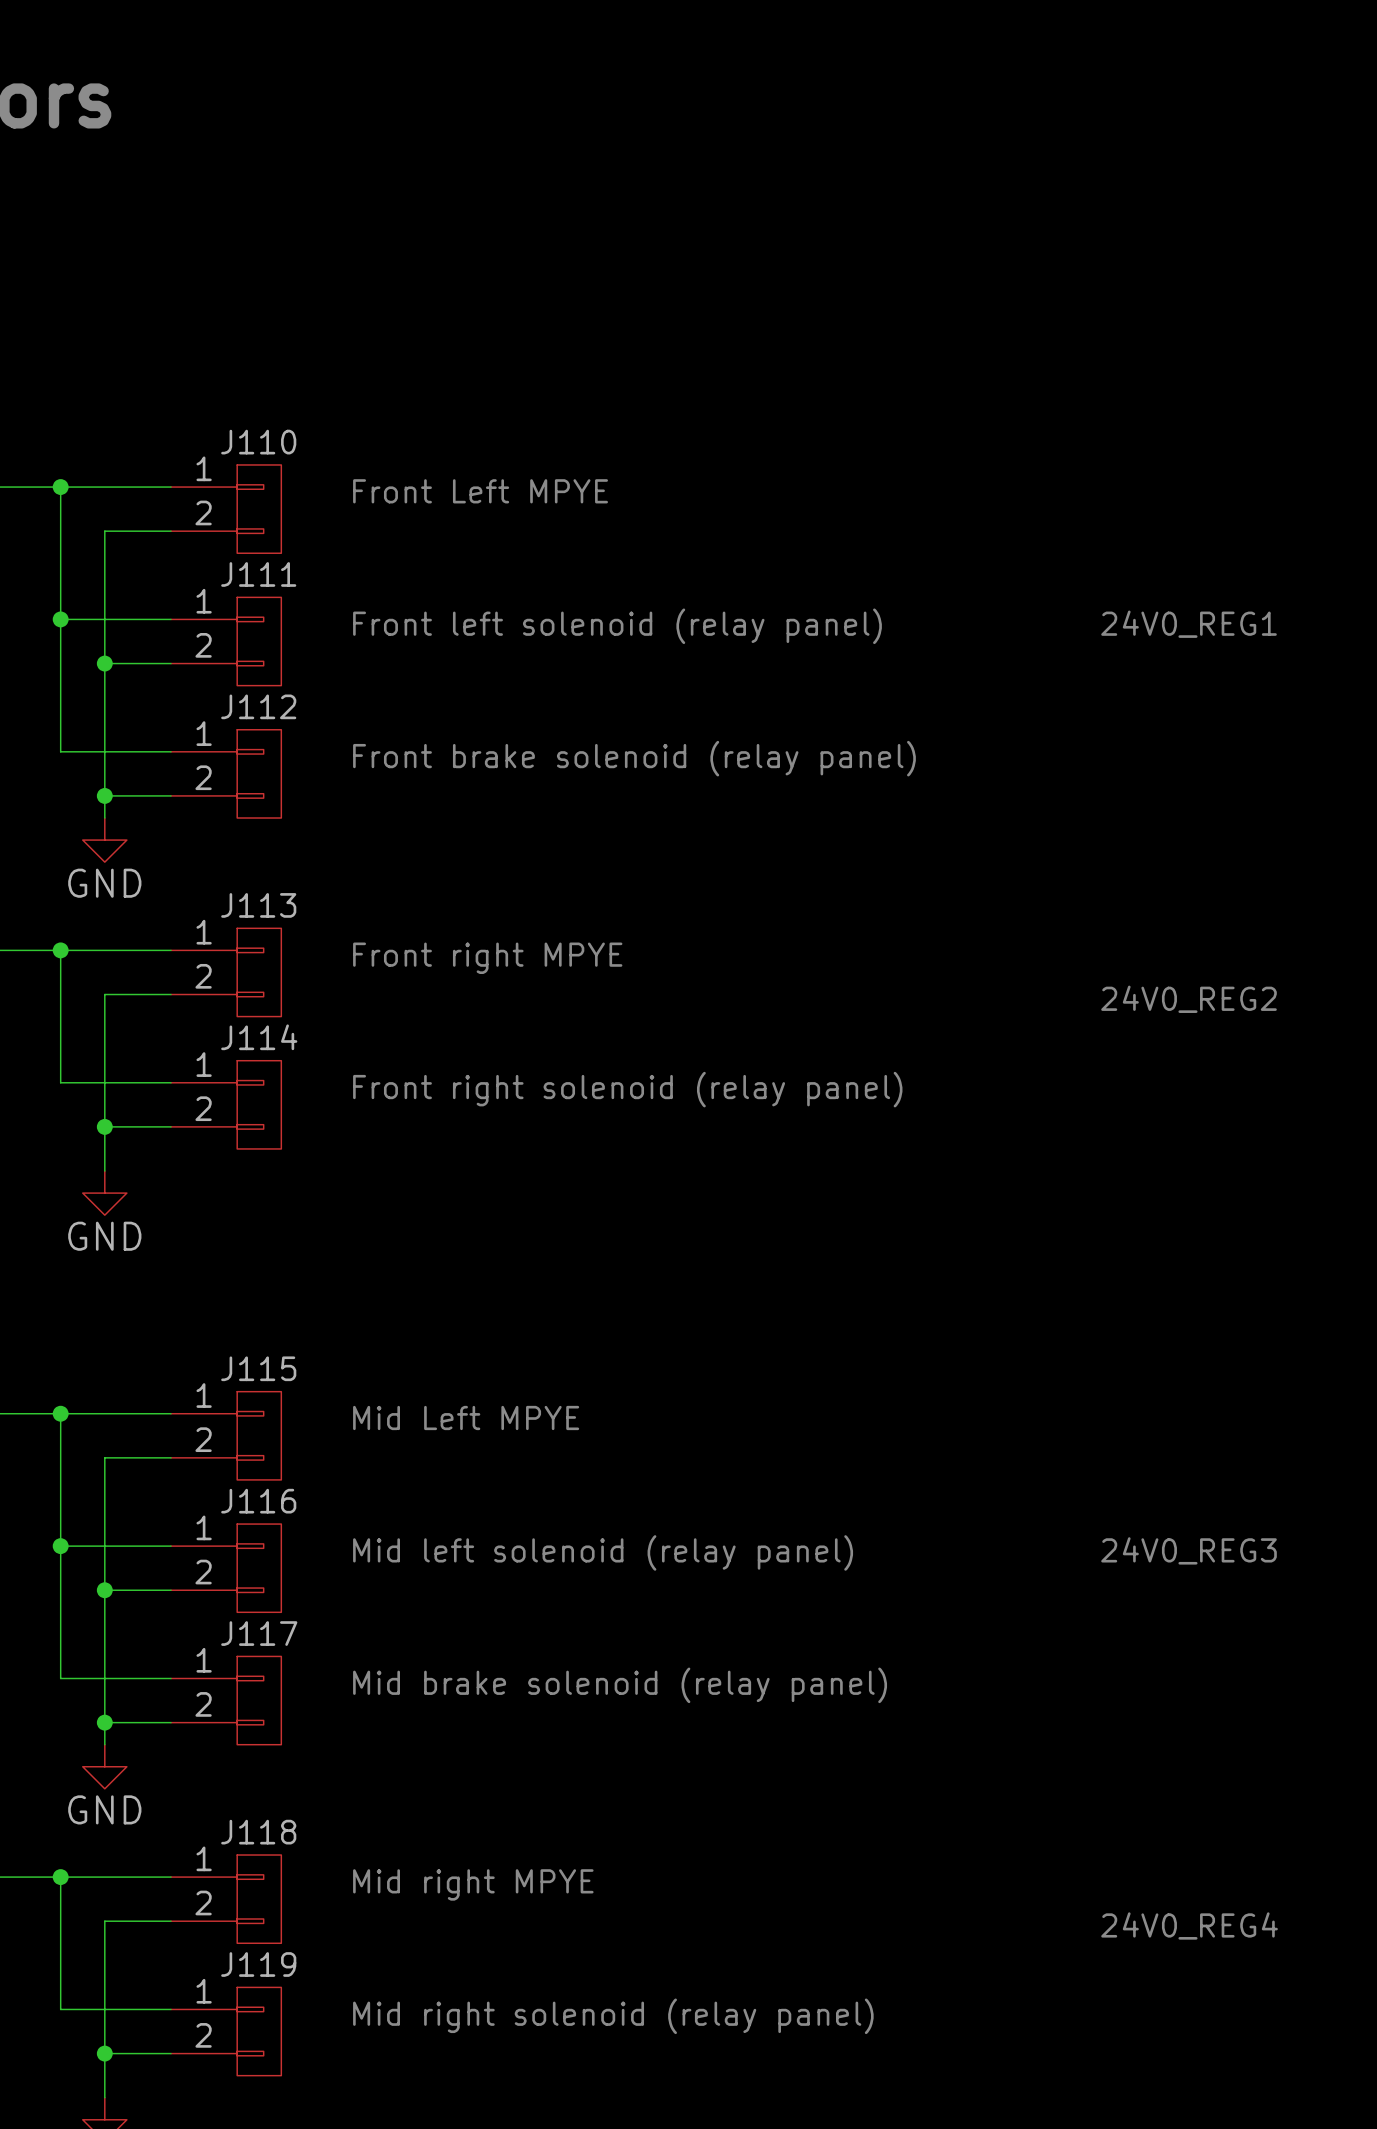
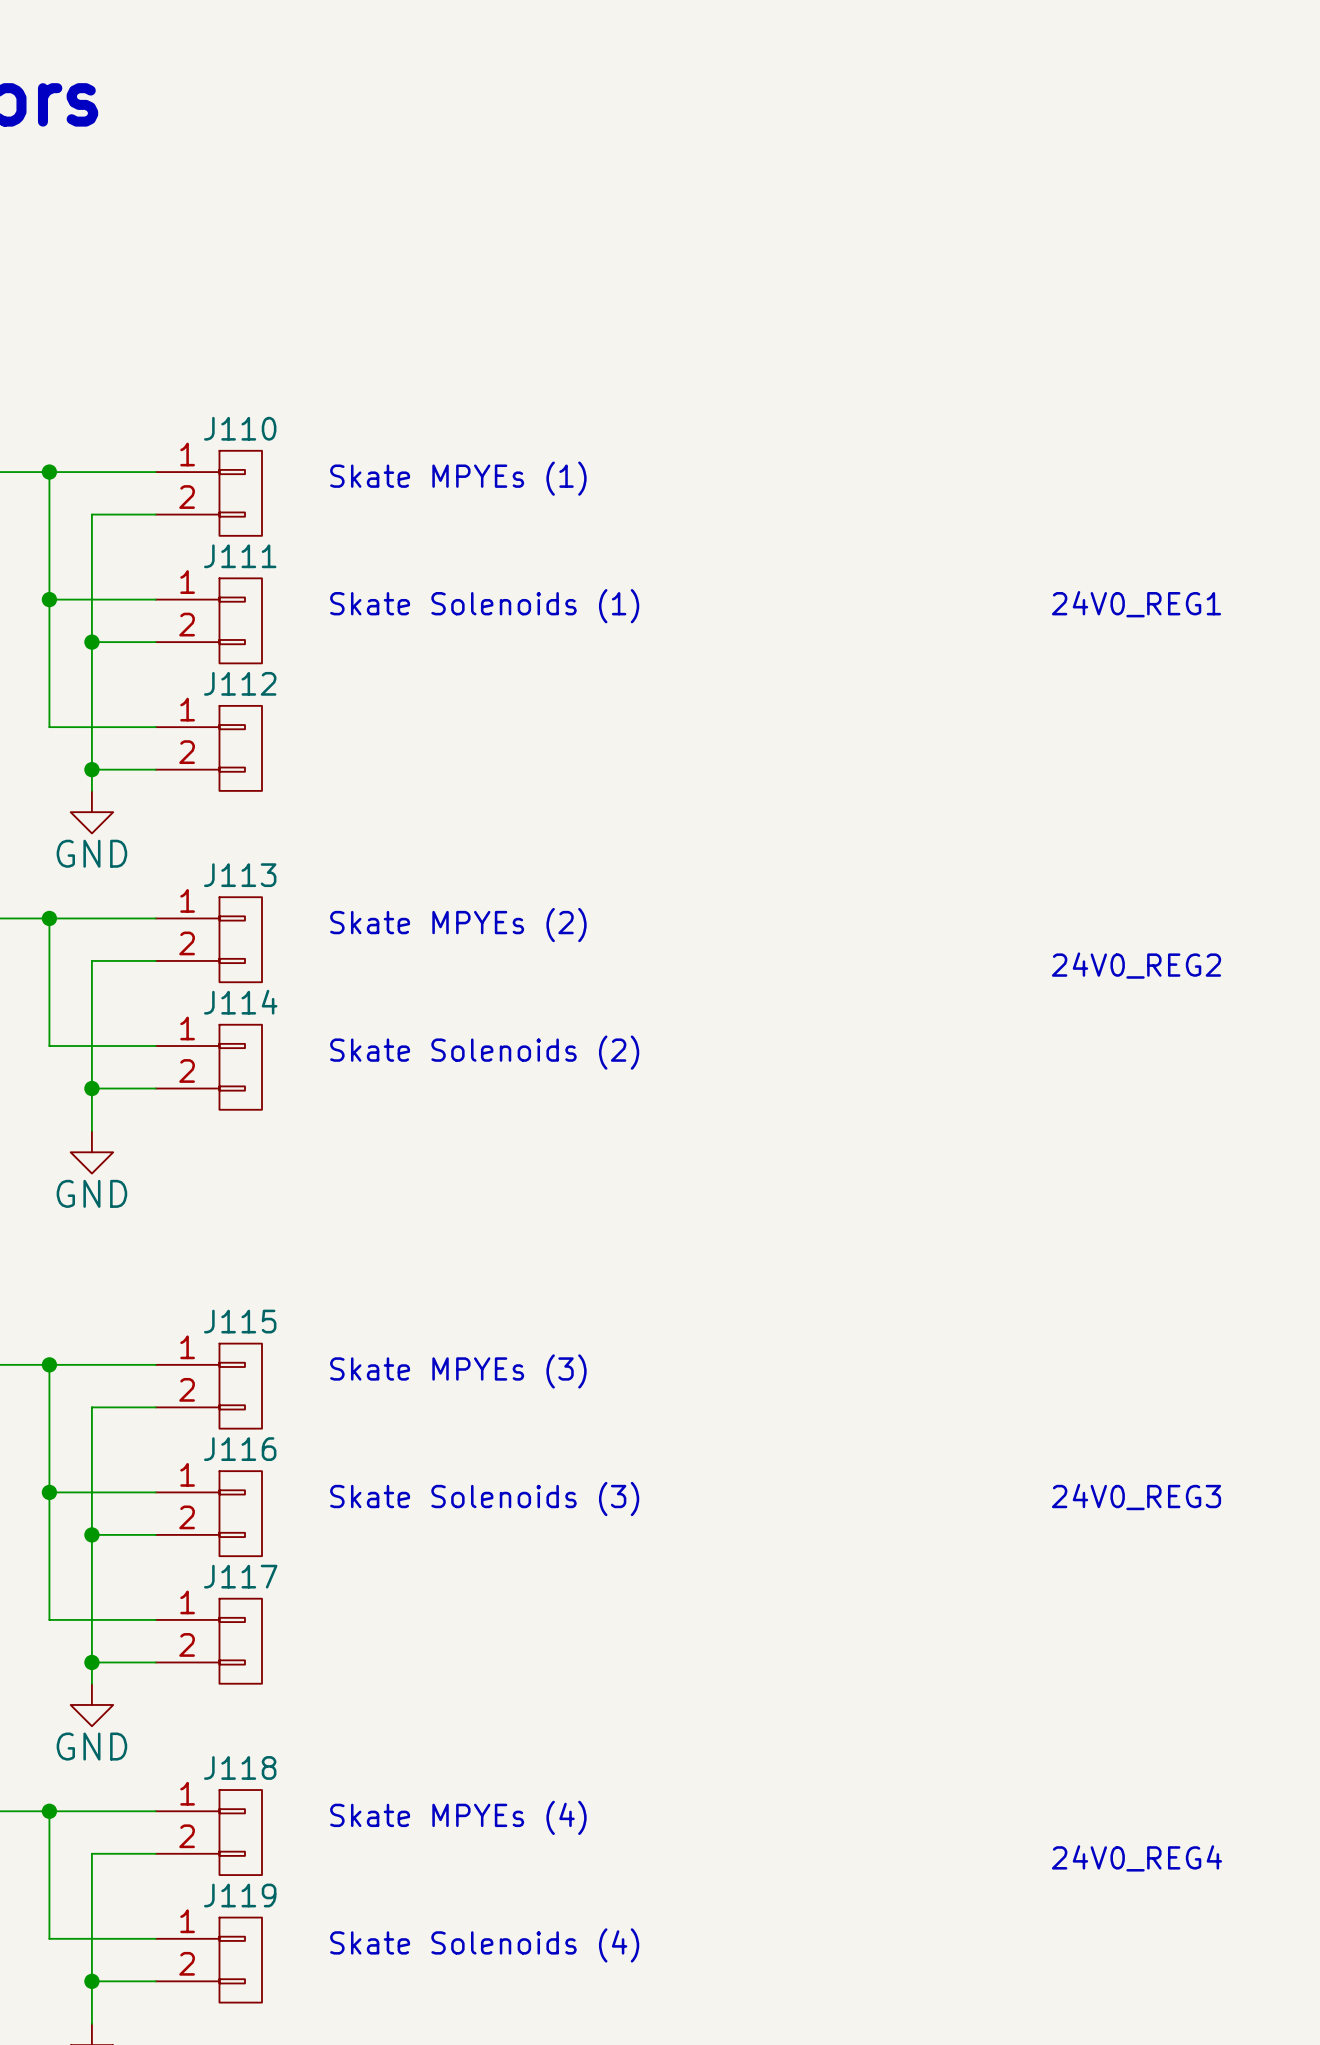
text: Front Left MPYE (480, 491) -> Skate MPYEs (1) (458, 478)
text: Front left solenoid (relay panel) (617, 626) -> Skate Solenoids (1) (484, 606)
text: Front brake solenoid (relay panel) (634, 758) -> none
text: Front right MPYE (487, 958) -> Skate MPYEs (2) (458, 925)
text: Front right solenoid (relay panel) (627, 1089) -> Skate Solenoids (2) (484, 1052)
text: Mid Left MPYE (466, 1417) -> Skate MPYEs (3) (458, 1371)
text: Mid left solenoid (relay panel) (603, 1552) -> Skate Solenoids (3) (484, 1499)
text: Mid brake solenoid (relay panel) (620, 1685) -> none
text: Mid right MPYE (473, 1884) -> Skate MPYEs (4) (458, 1817)
text: Mid right solenoid (relay panel) (613, 2016) -> Skate Solenoids (4) (484, 1945)

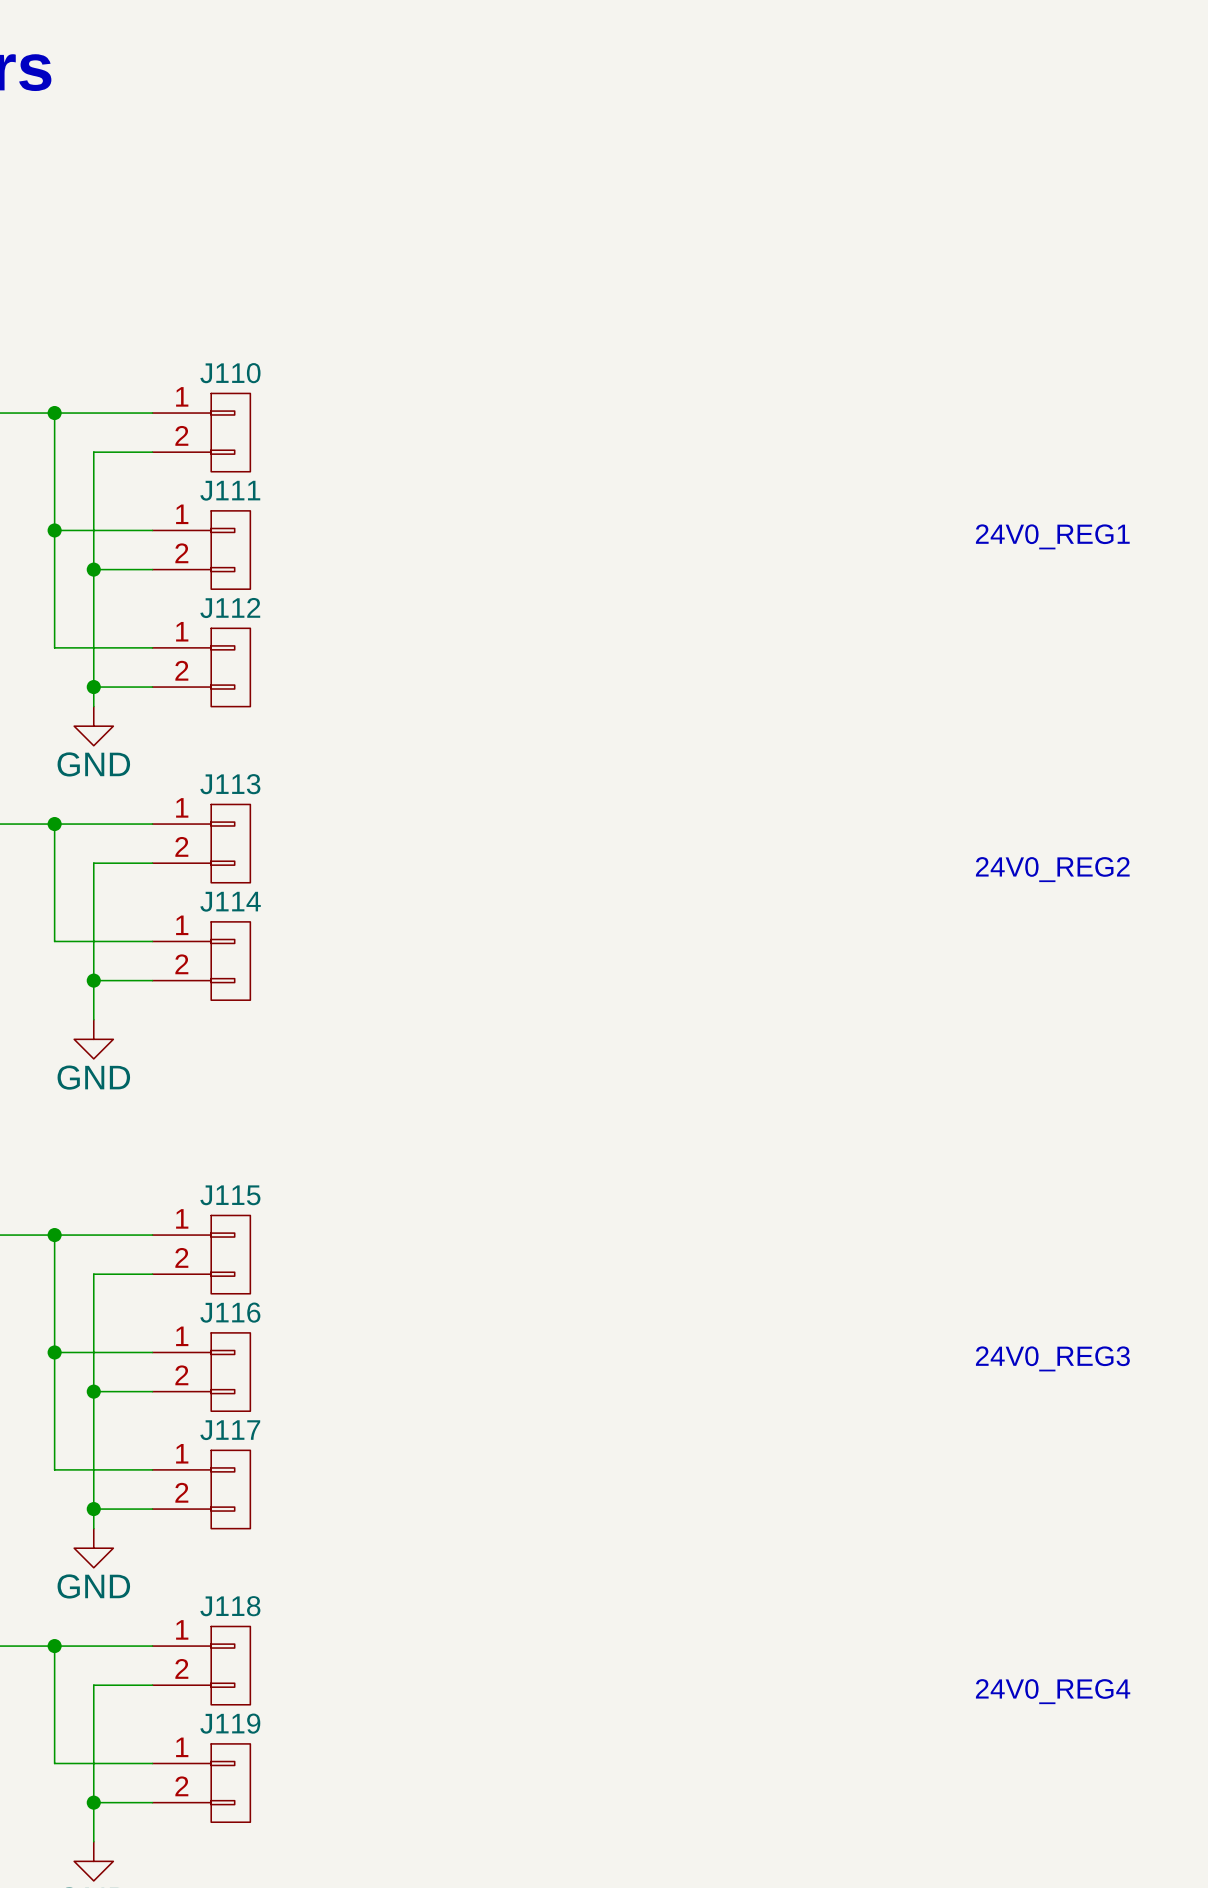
text: Skate MPYEs (1) (458, 478) -> none
text: Skate Solenoids (1) (484, 606) -> none
text: Skate MPYEs (2) (458, 925) -> none
text: Skate Solenoids (2) (484, 1052) -> none
text: Skate MPYEs (3) (458, 1371) -> none
text: Skate Solenoids (3) (484, 1499) -> none
text: Skate MPYEs (4) (458, 1817) -> none
text: Skate Solenoids (4) (484, 1945) -> none

